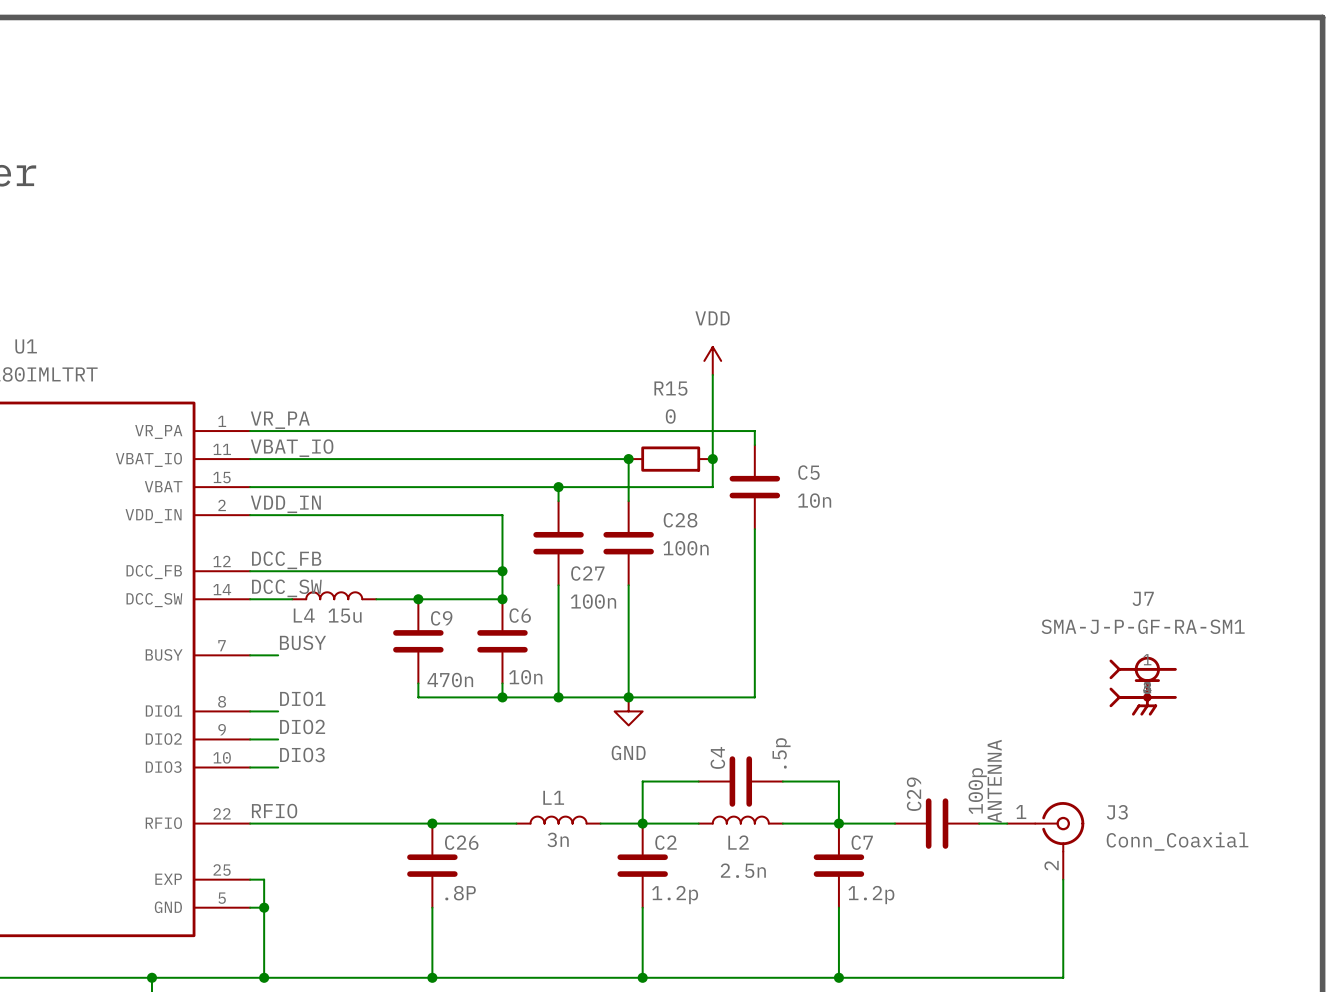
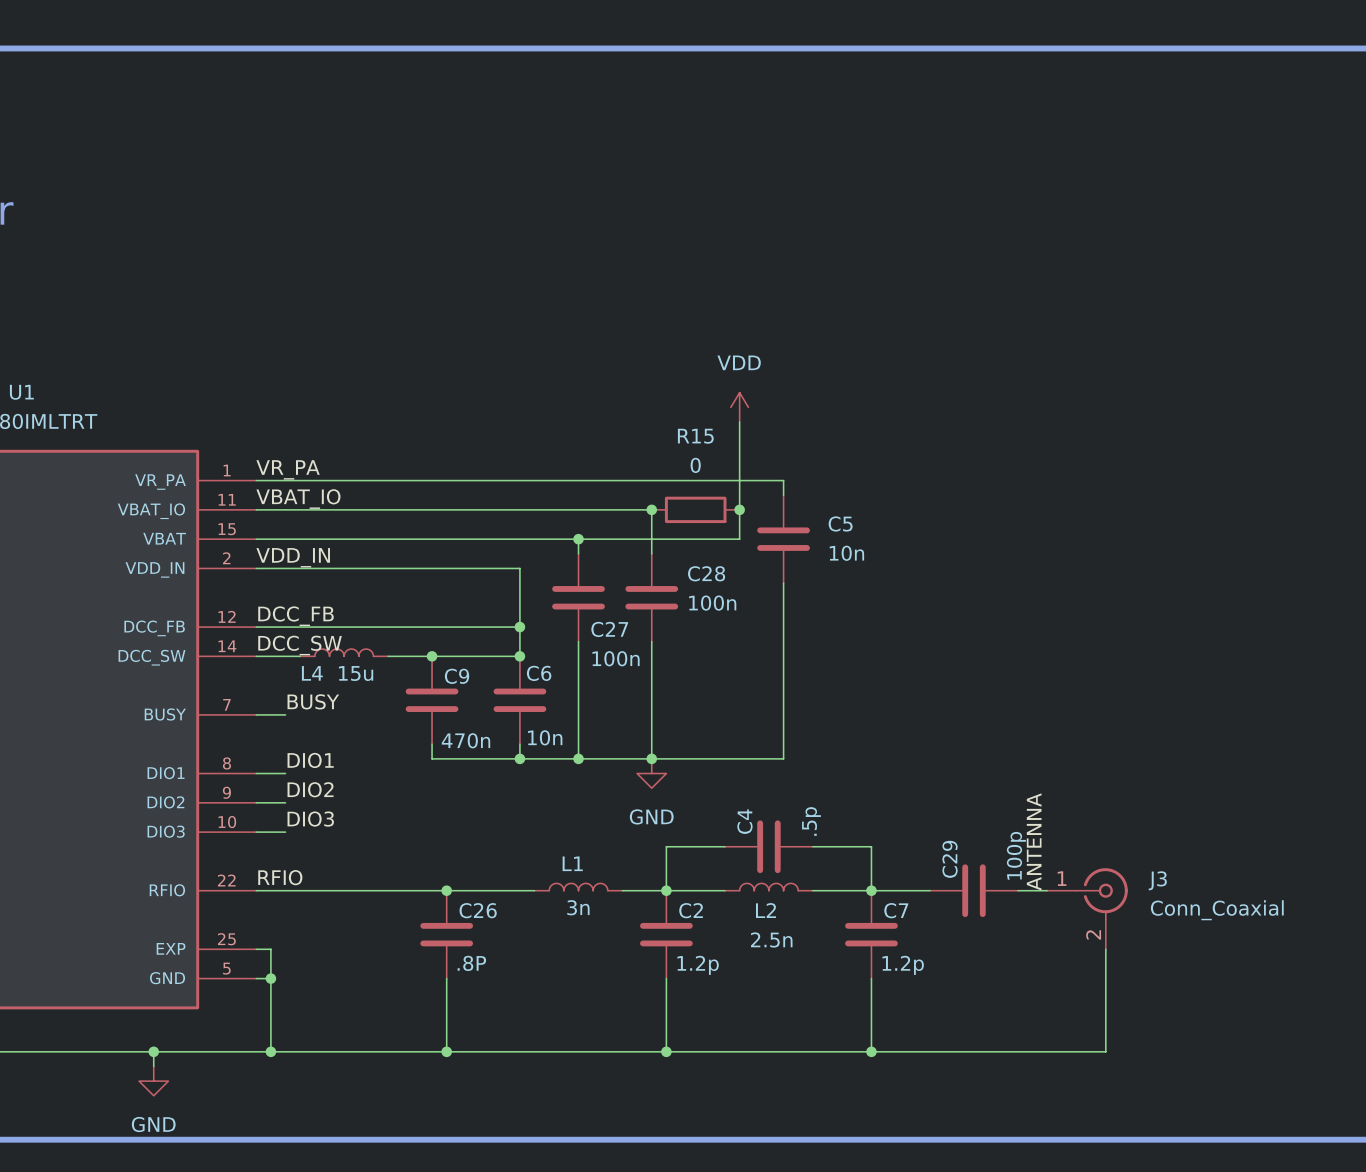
J7: SMA-J-P-GF-RA-SM1 (1143, 686) -> none

